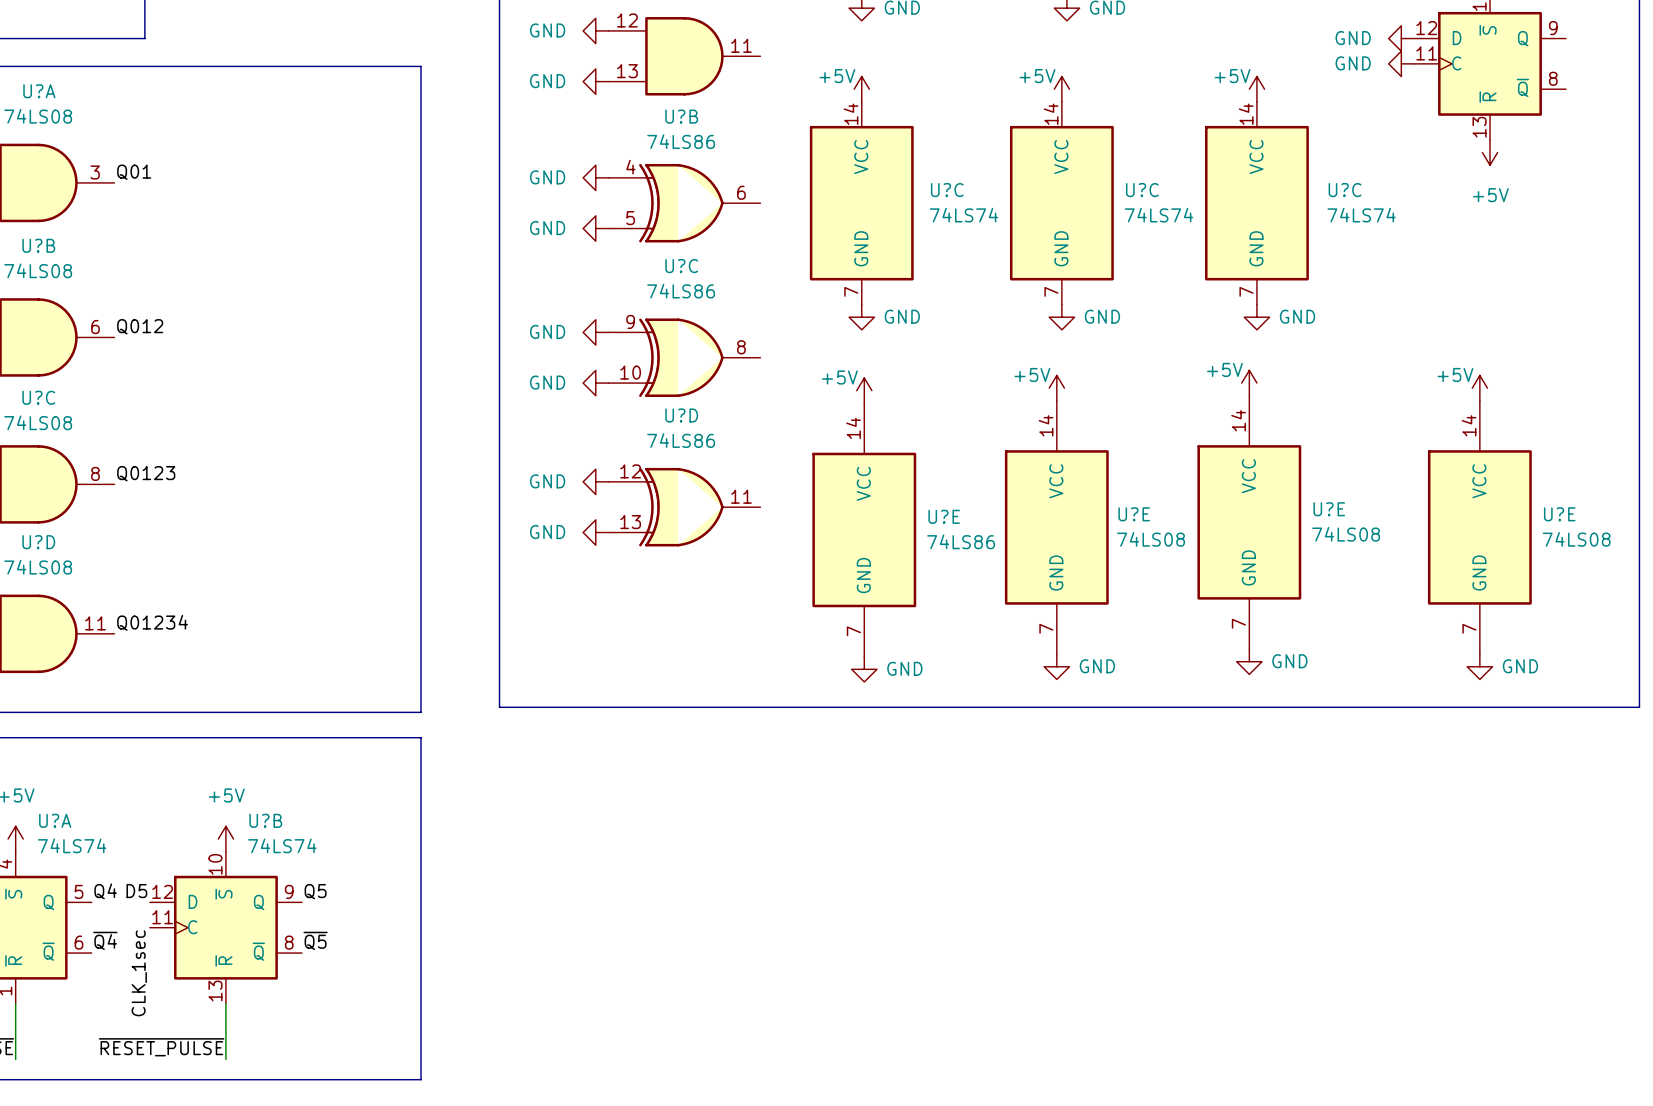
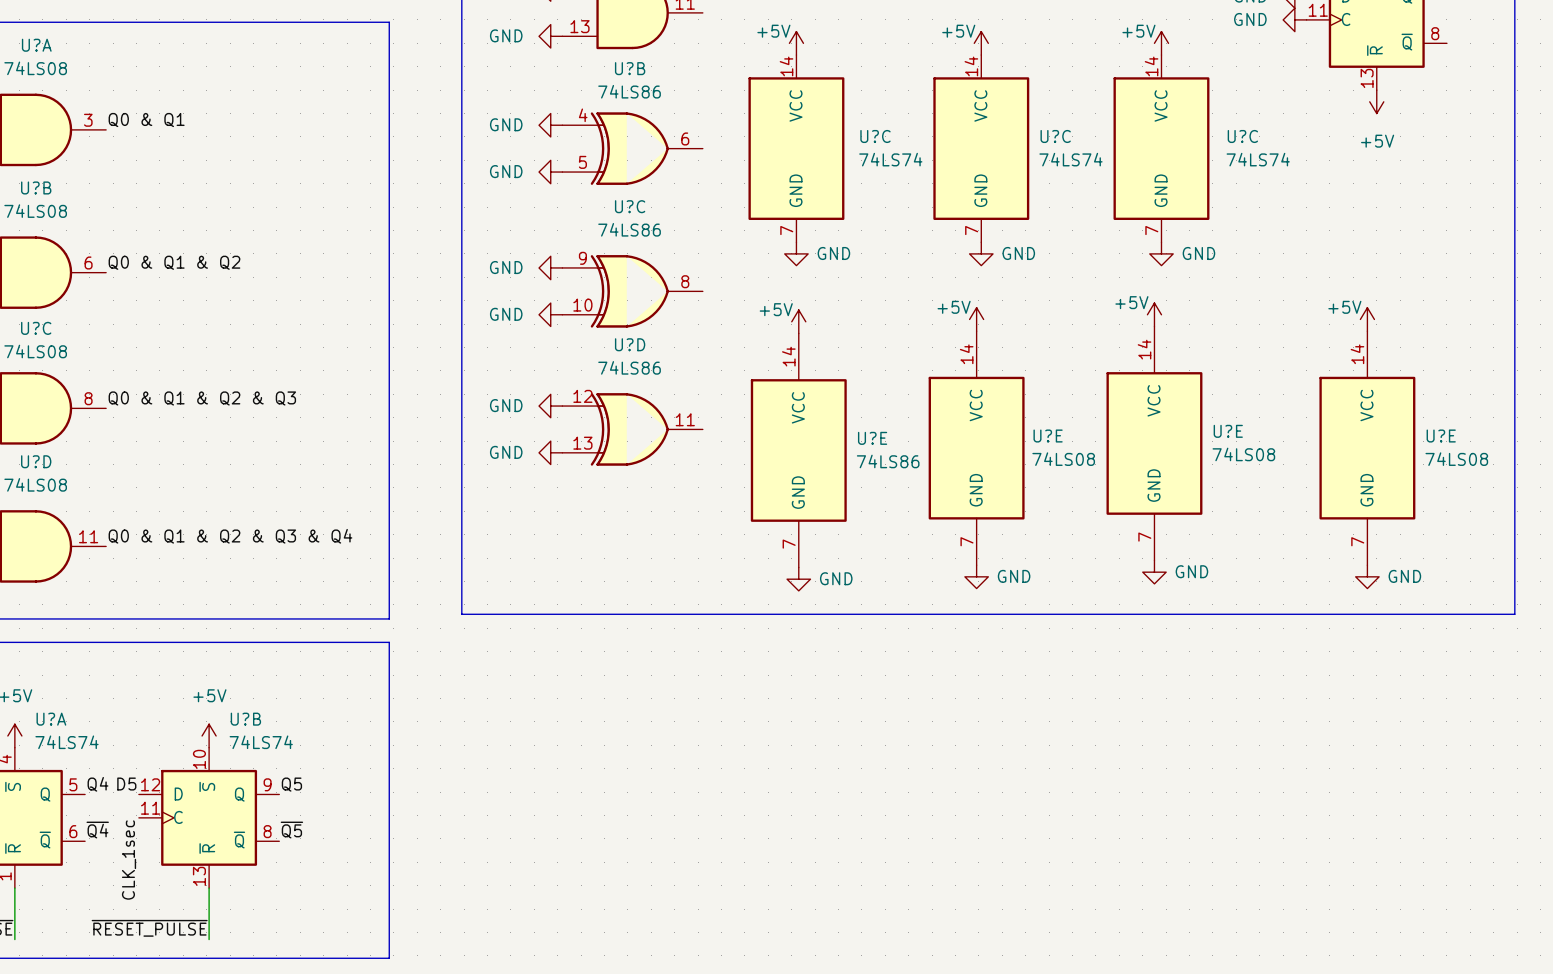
label: Q01 (134, 172) -> Q0 & Q1 (146, 120)
label: Q012 (140, 326) -> Q0 & Q1 & Q2 (174, 262)
label: Q0123 (146, 473) -> Q0 & Q1 & Q2 & Q3 (202, 398)
label: Q01234 (152, 622) -> Q0 & Q1 & Q2 & Q3 & Q4 (230, 536)

